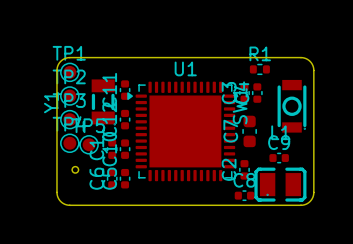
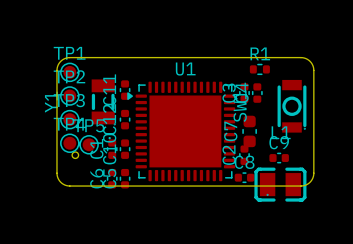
part position: (75, 169) -> (75, 155)
C2 position: (244, 169) -> (244, 155)
board edge: (56, 173) (57, 197) (63, 203) (69, 205) (302, 205) (308, 202) (312, 197) (313, 173) -> (56, 173) (60, 182) (69, 186) (300, 186) (310, 182) (313, 173)
C8 position: (244, 195) -> (244, 177)

